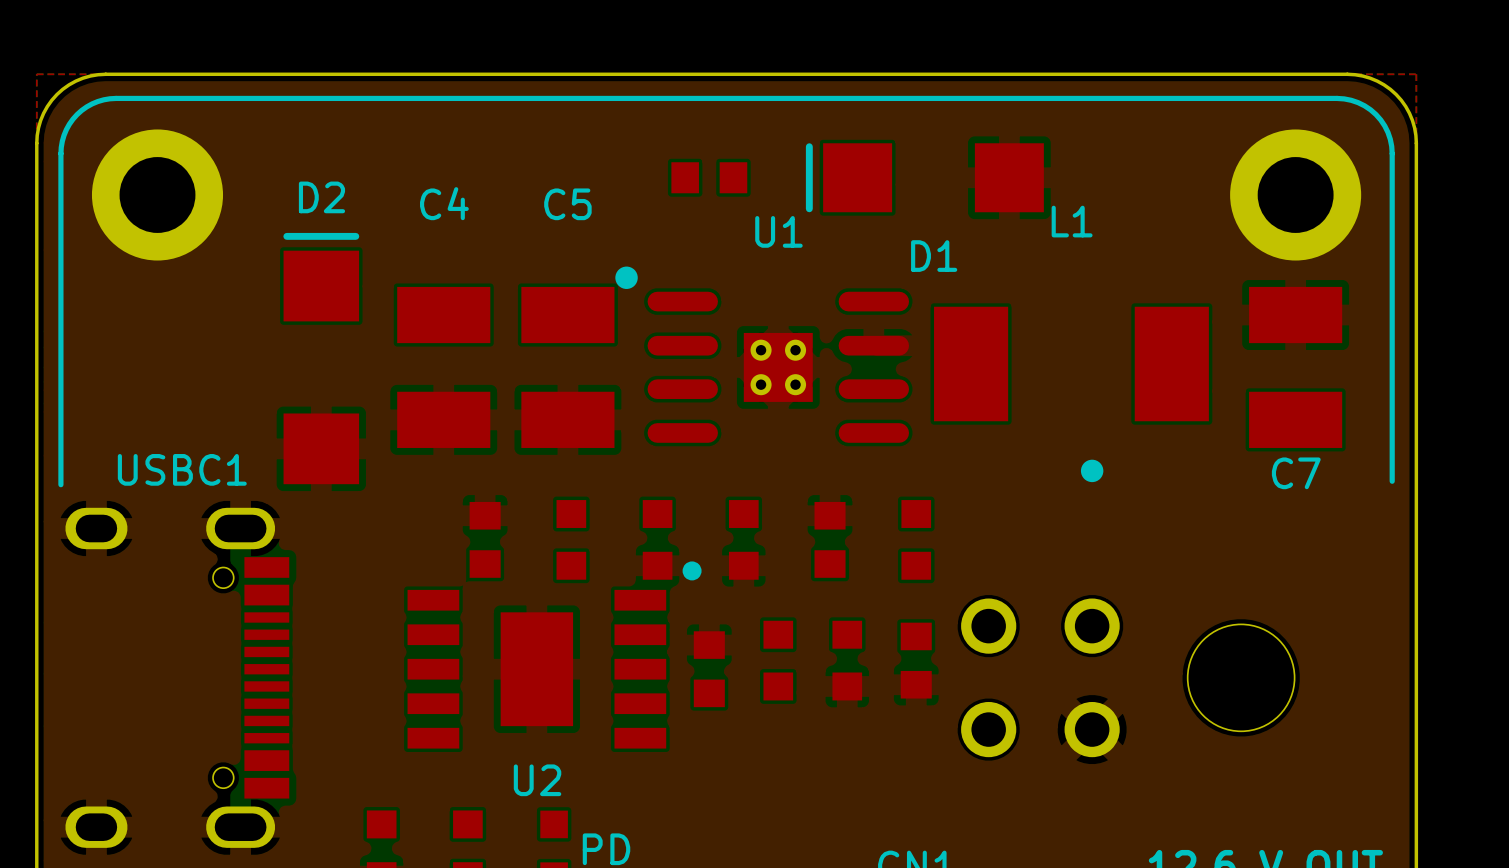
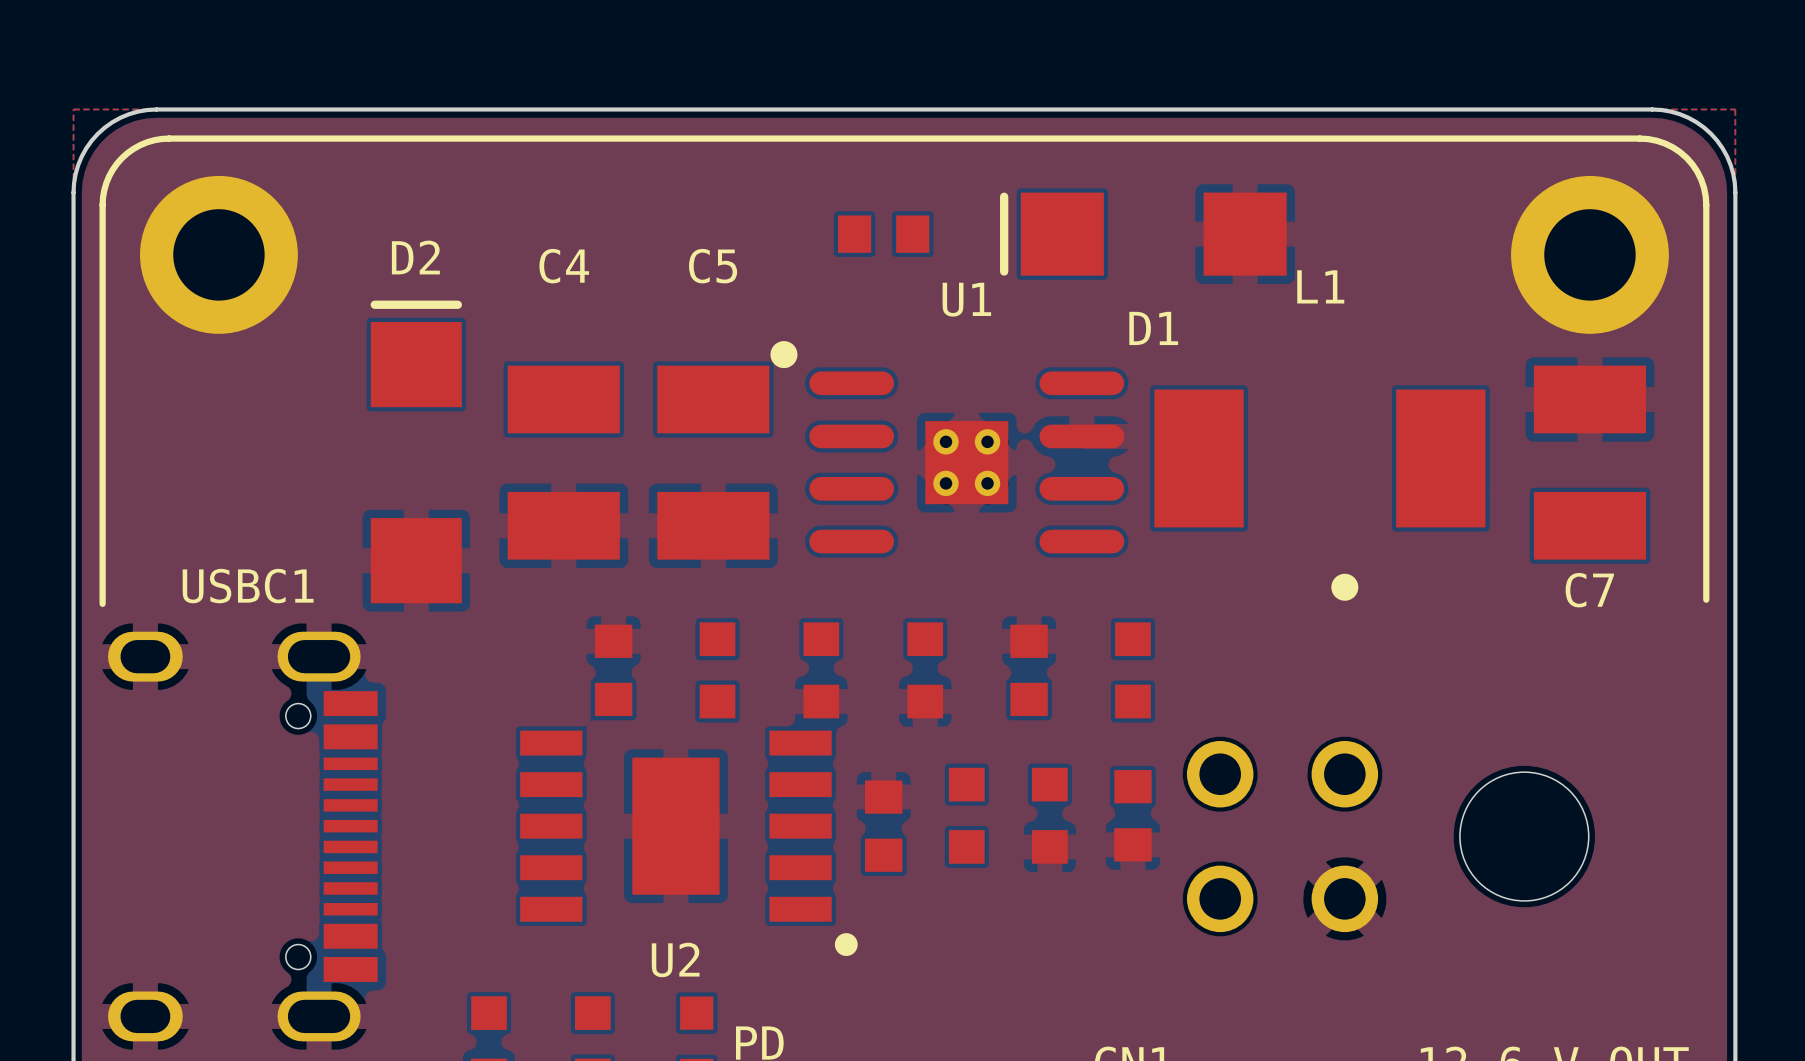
drawing position: (692, 570) -> (846, 944)

